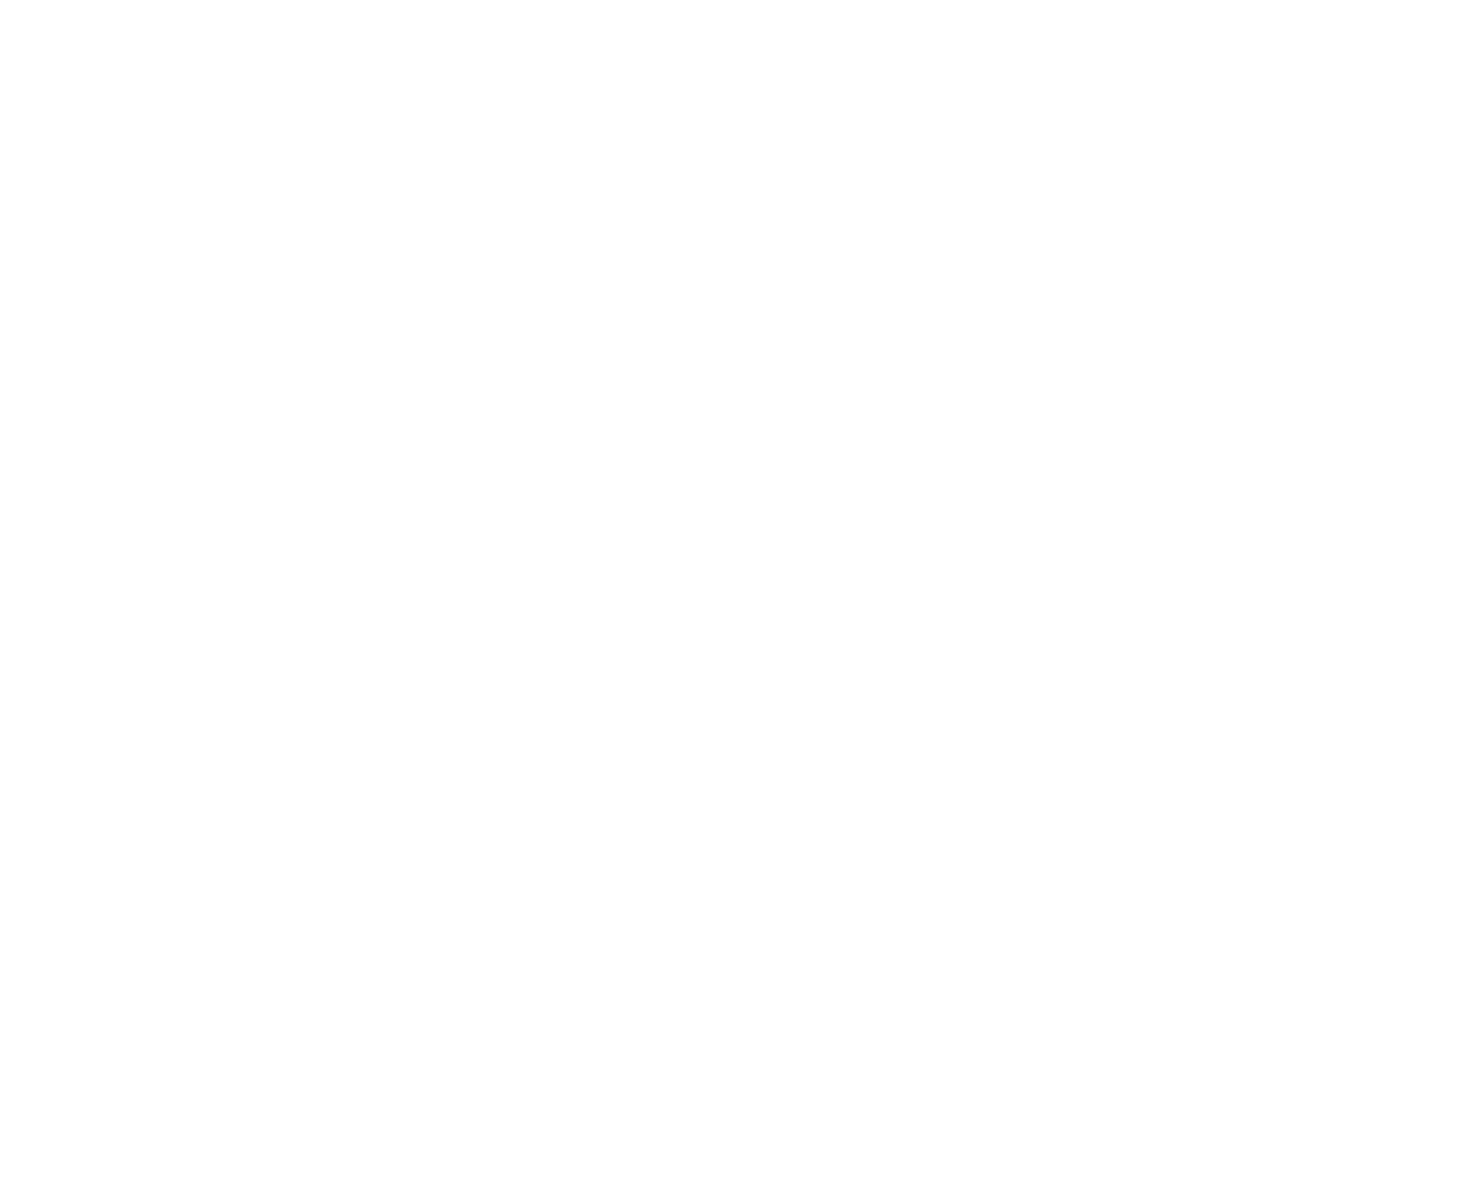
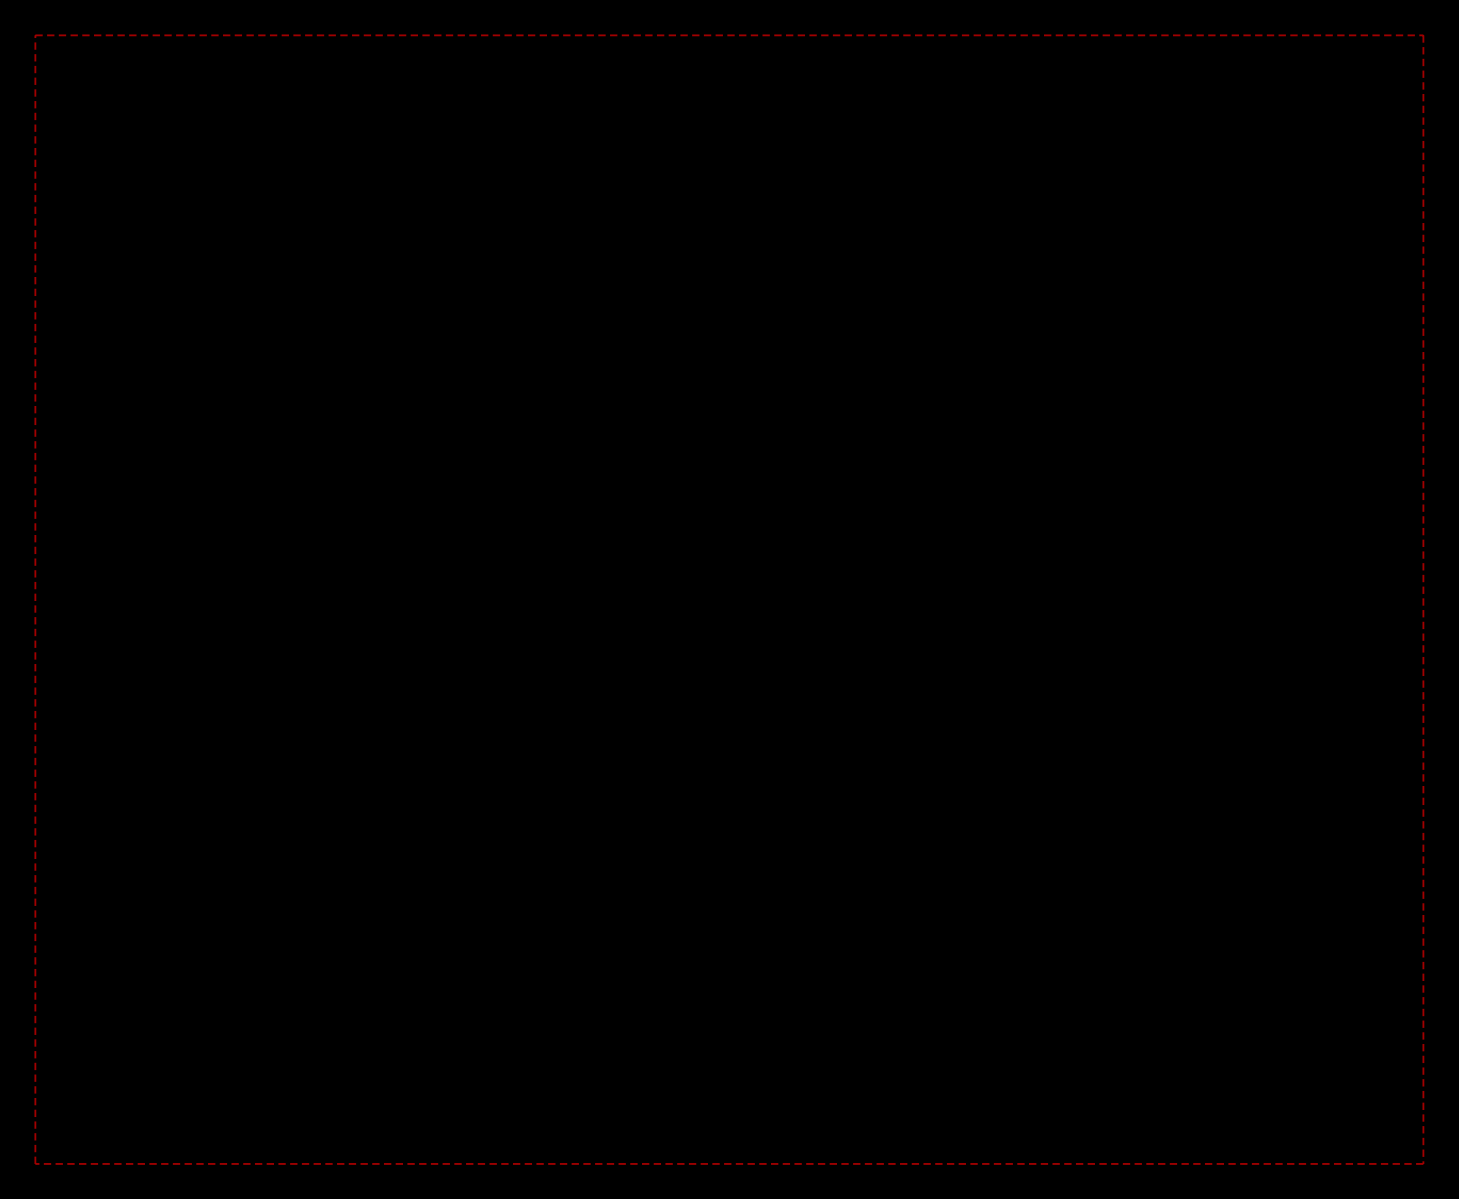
zone outline: none -> (35, 35) (1423, 35) (1423, 1163) (35, 1163) (35, 35)

